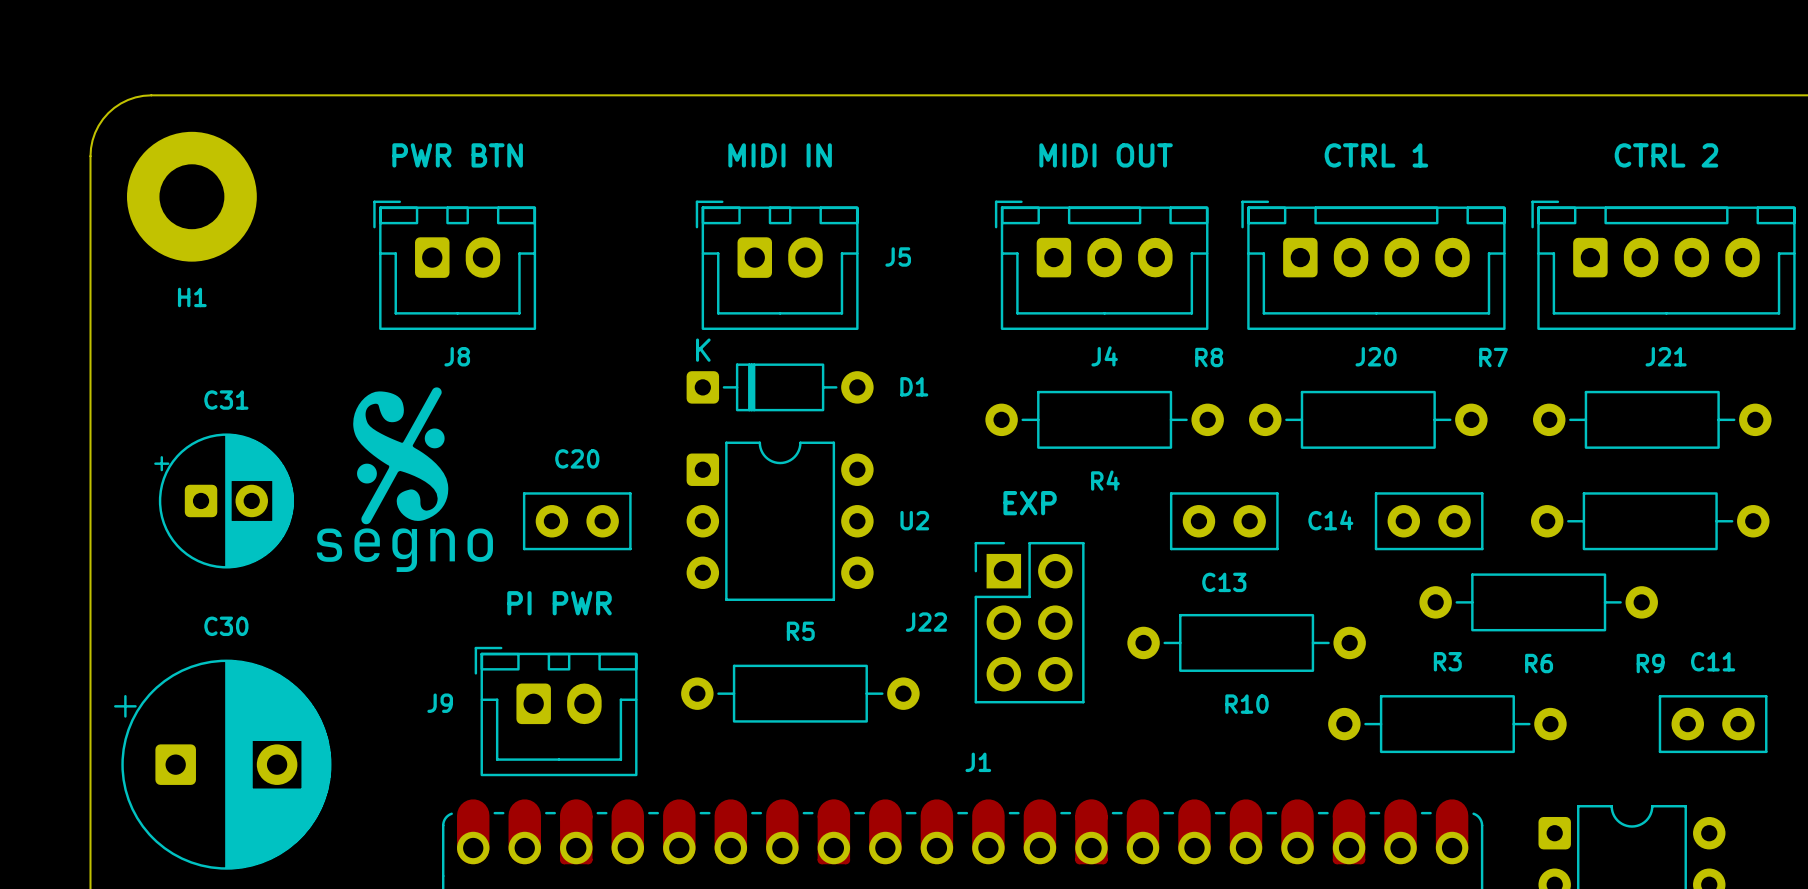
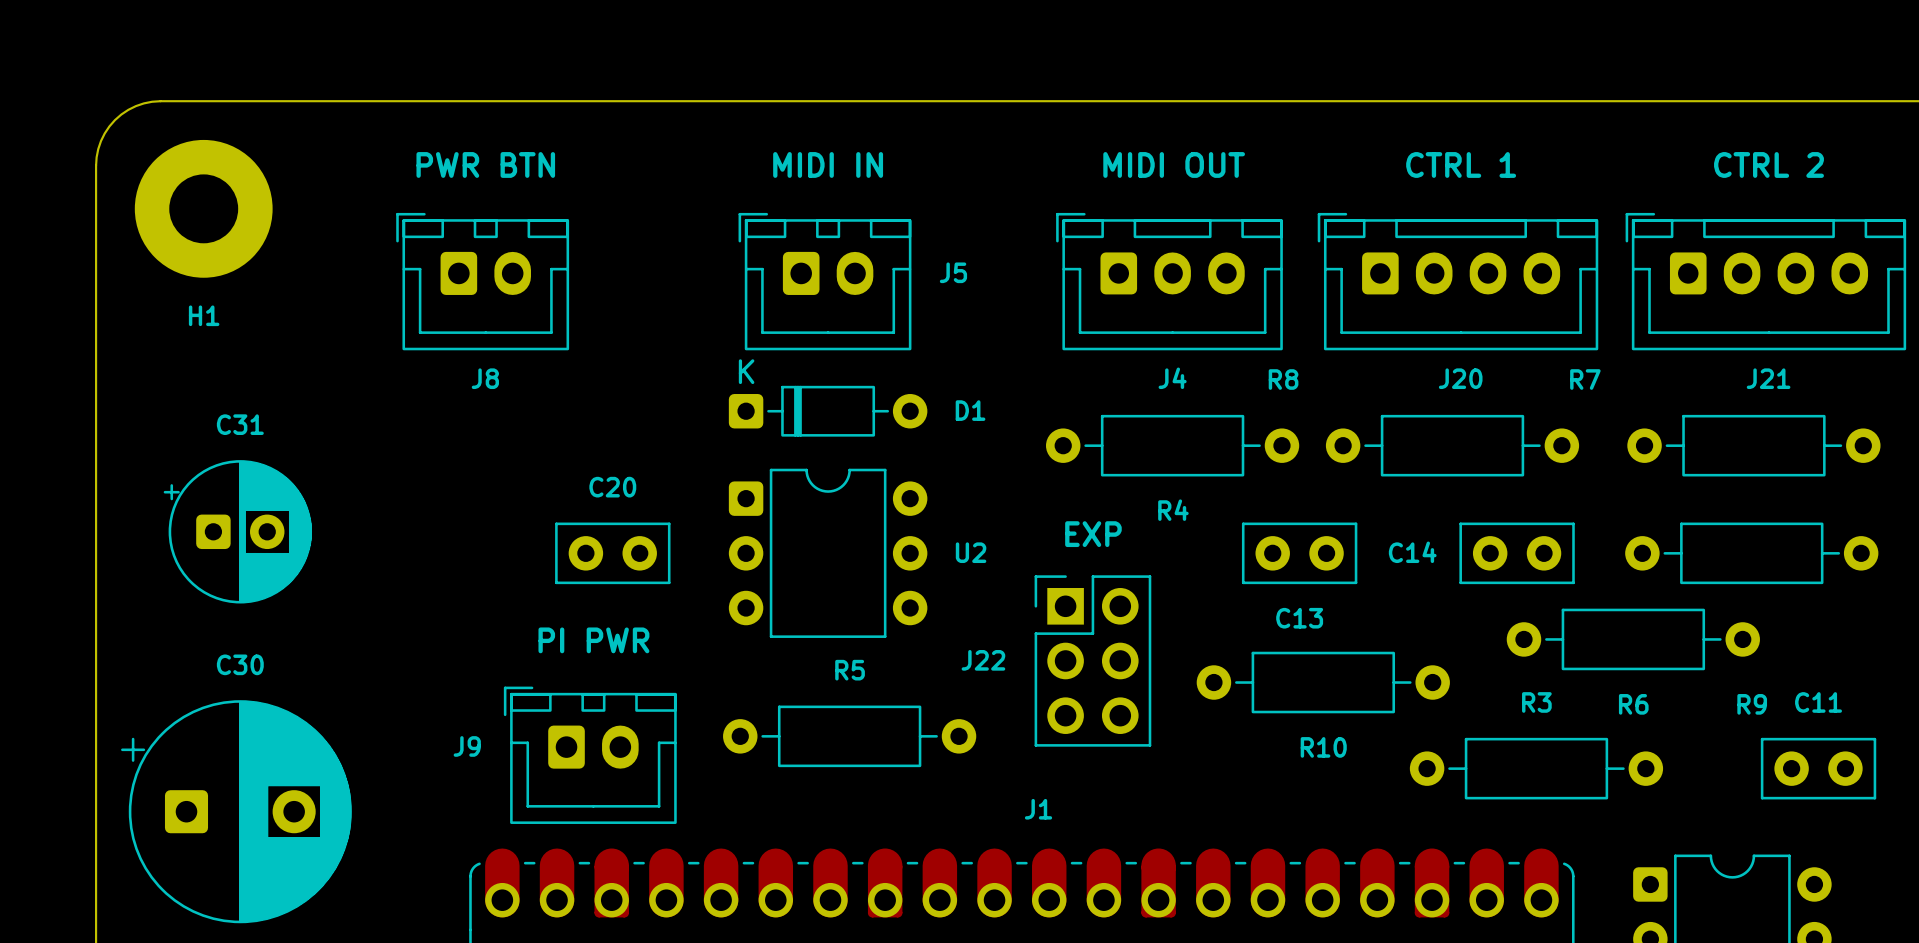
drawing: [316, 387, 493, 572] -> none

